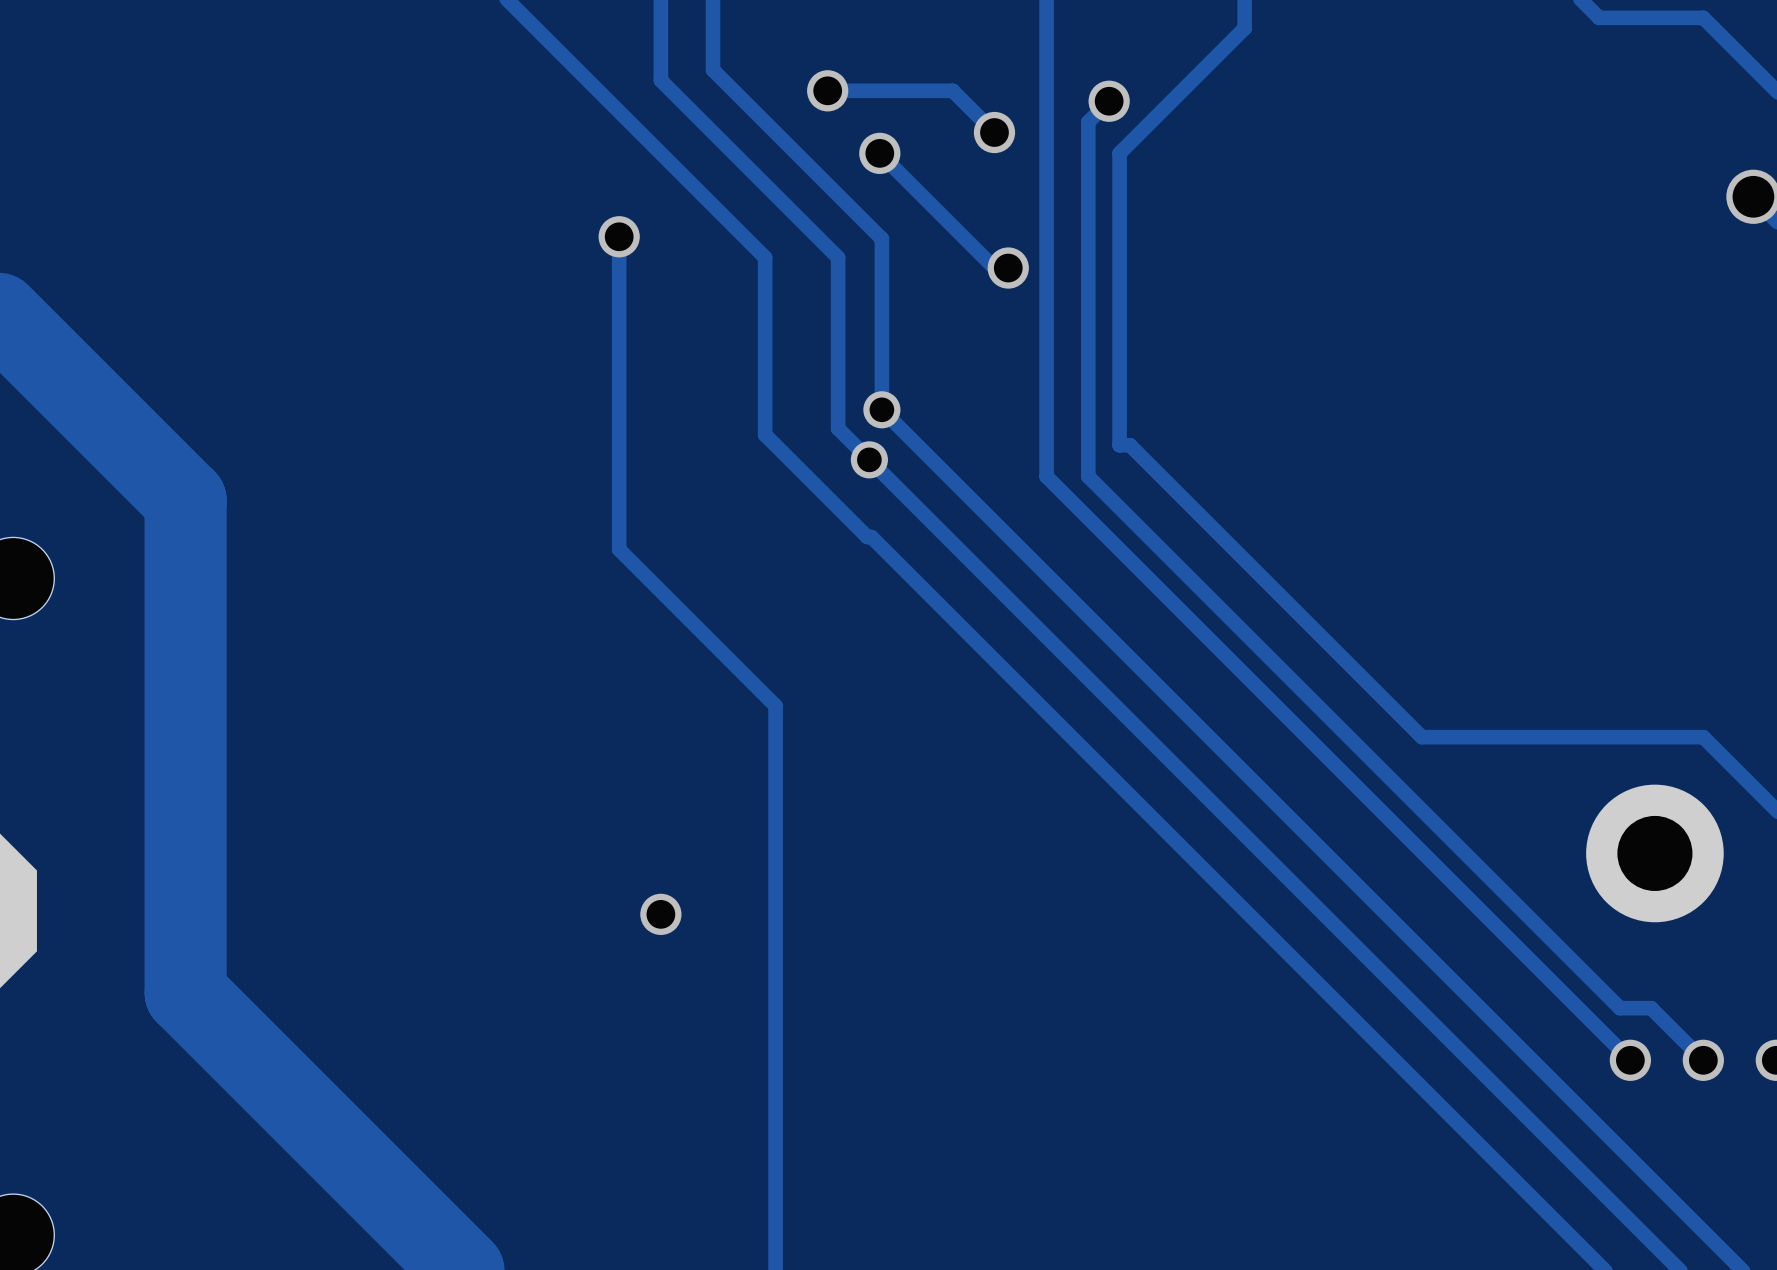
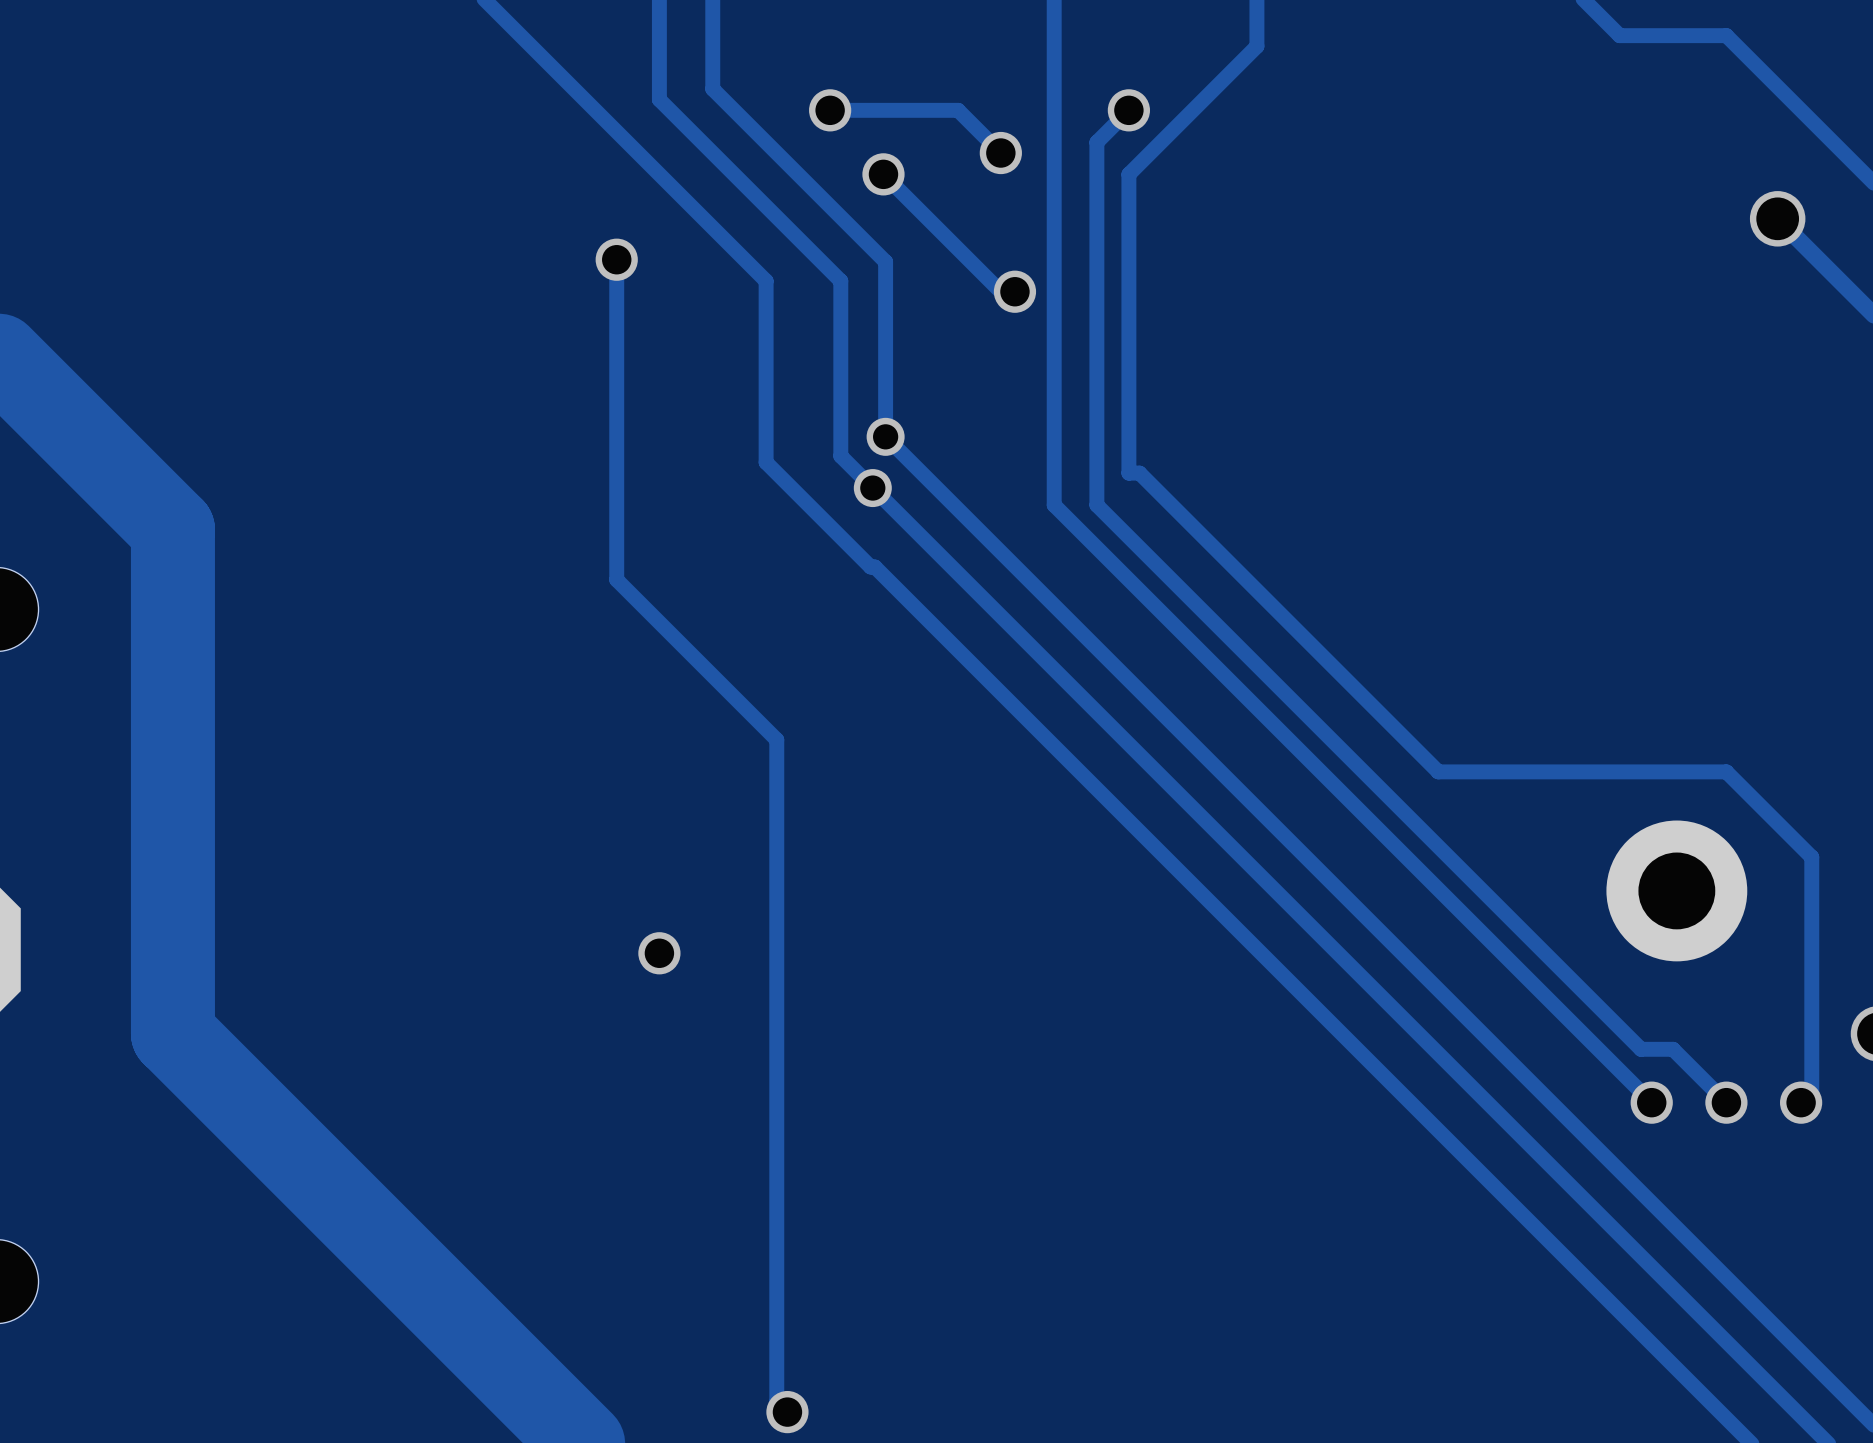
via position: (1109, 101) -> (1128, 110)

